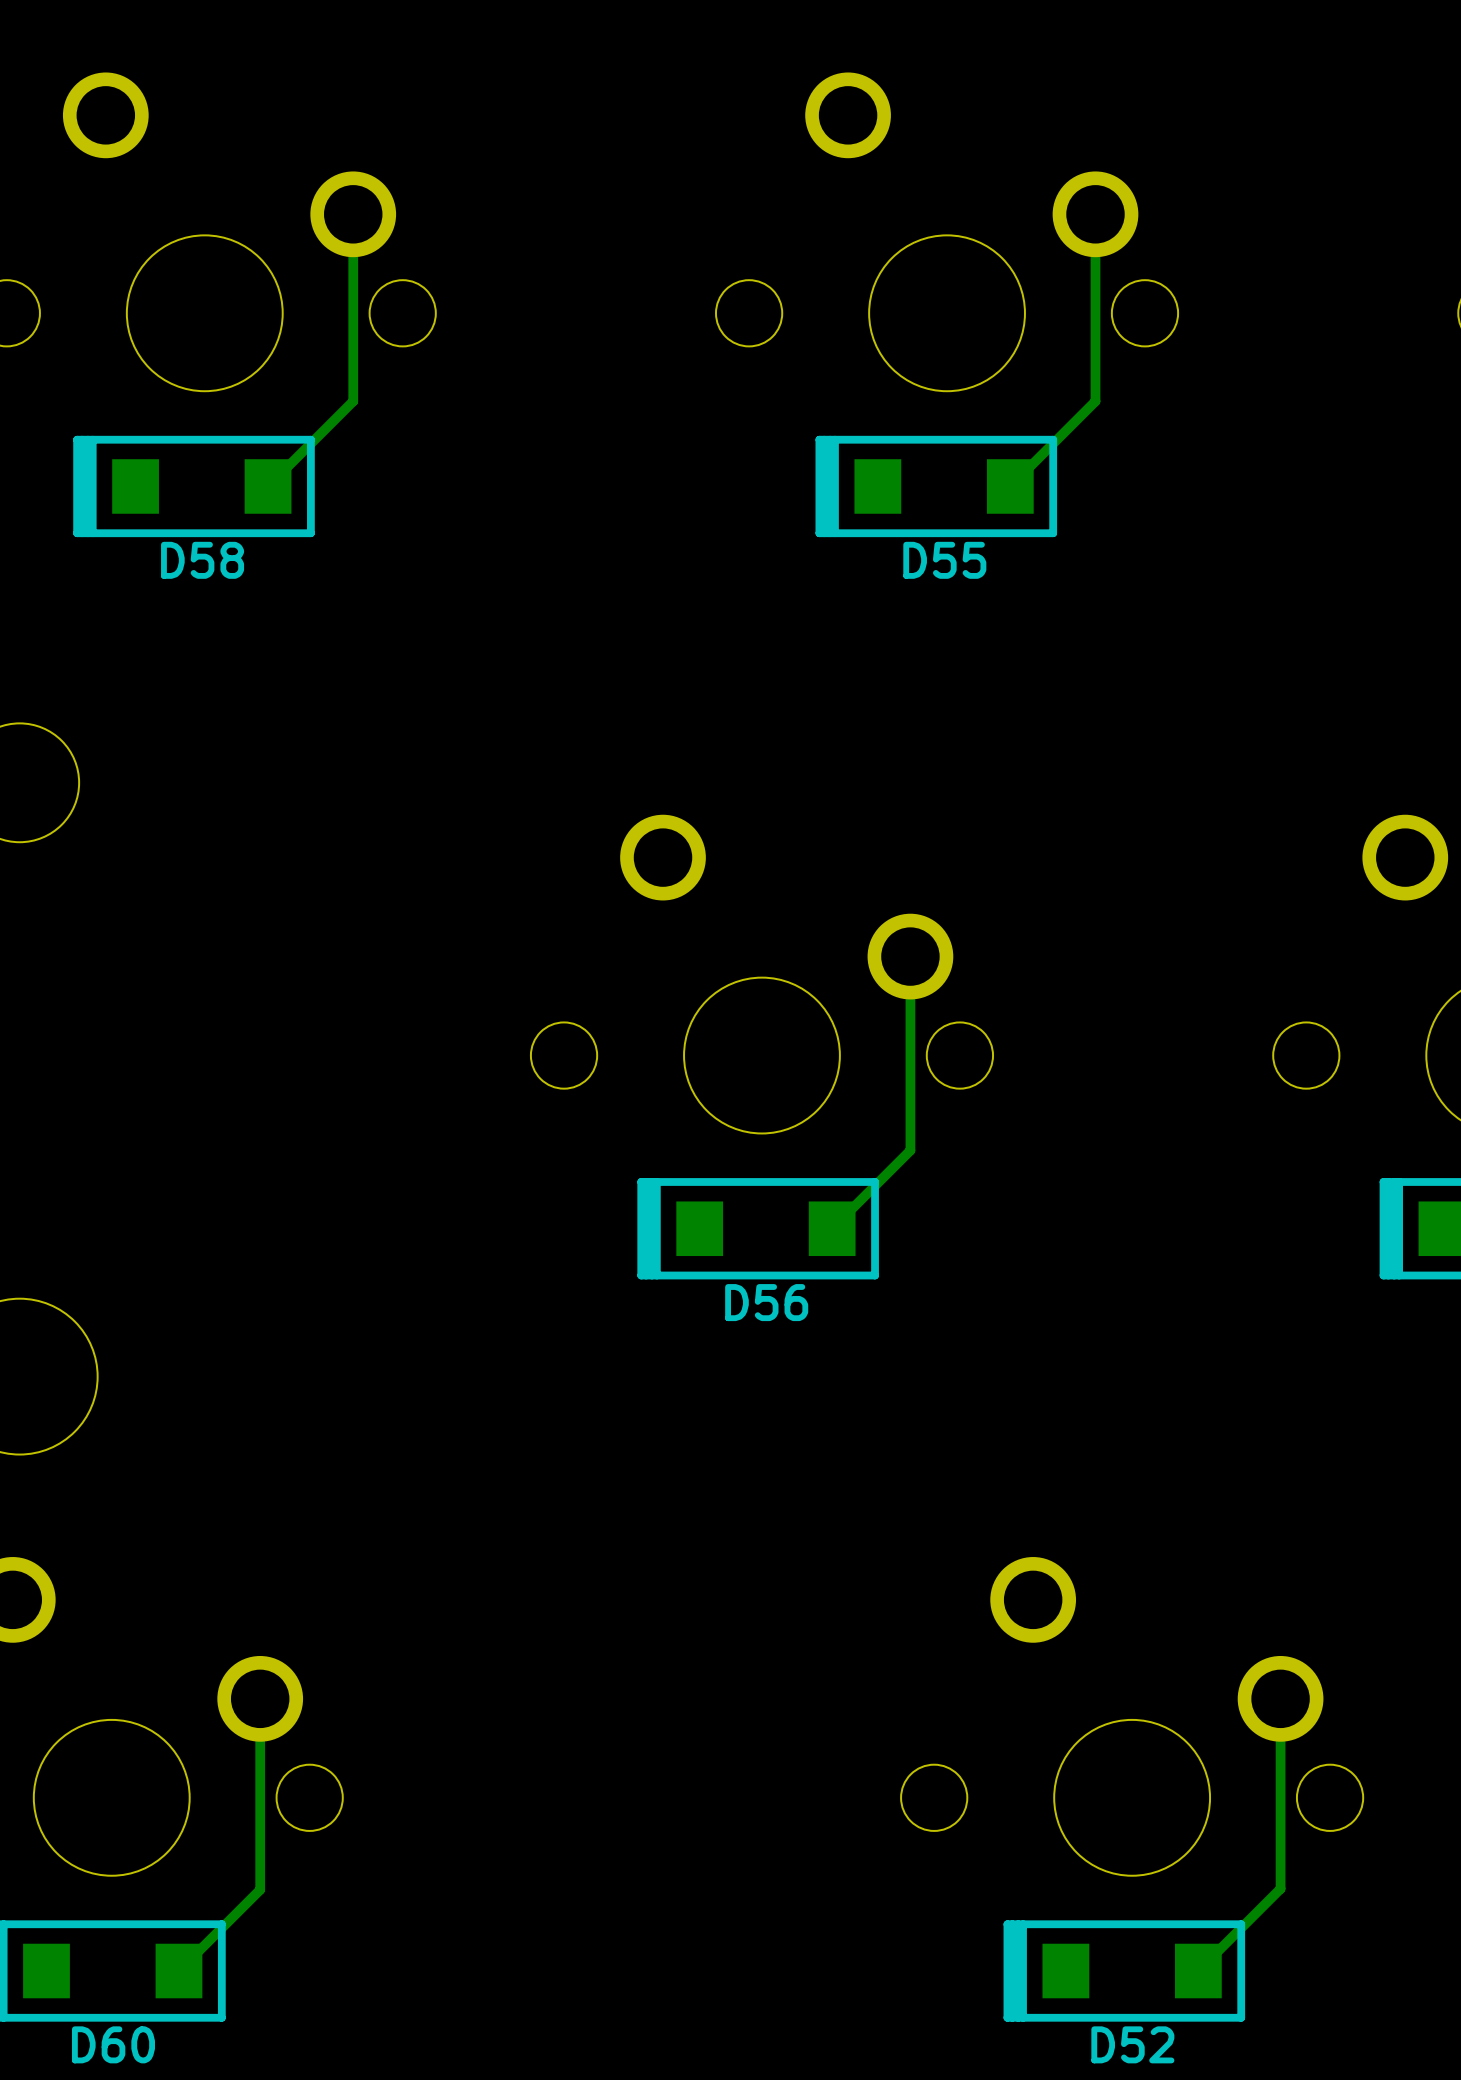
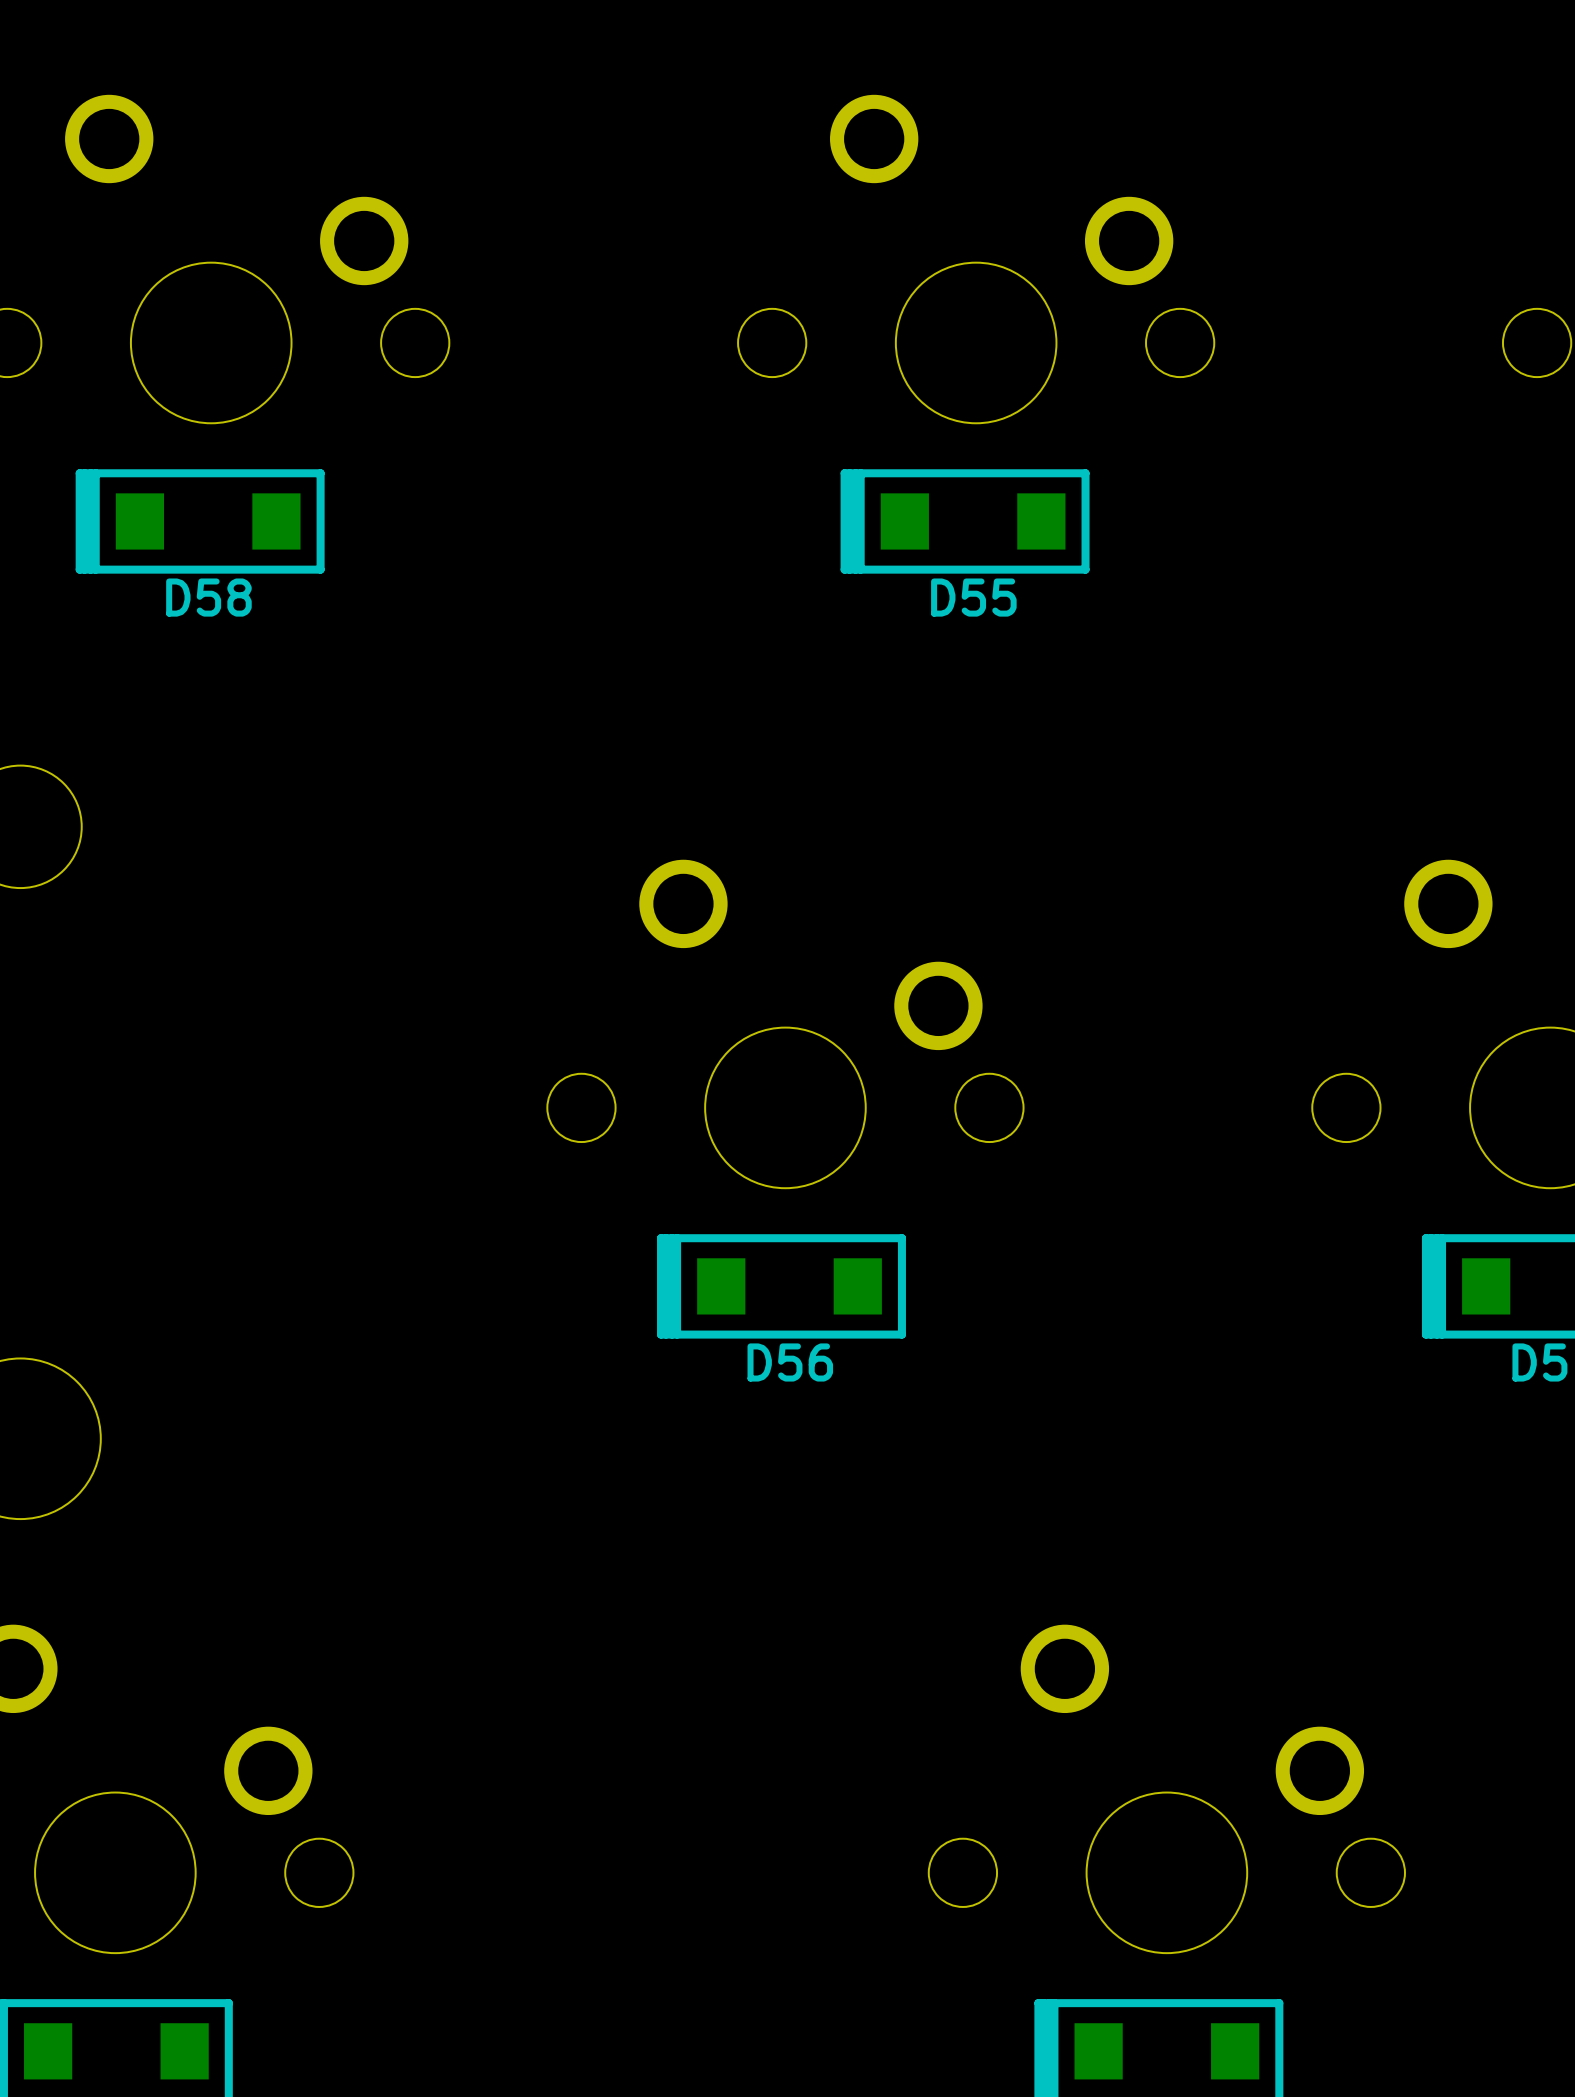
track: (353, 214) (353, 401) (268, 486) -> none
track: (1095, 214) (1095, 401) (1010, 486) -> none
track: (910, 956) (910, 1150) (832, 1228) -> none
track: (260, 1698) (260, 1889) (178, 1971) -> none
track: (1280, 1698) (1280, 1888) (1198, 1971) -> none

